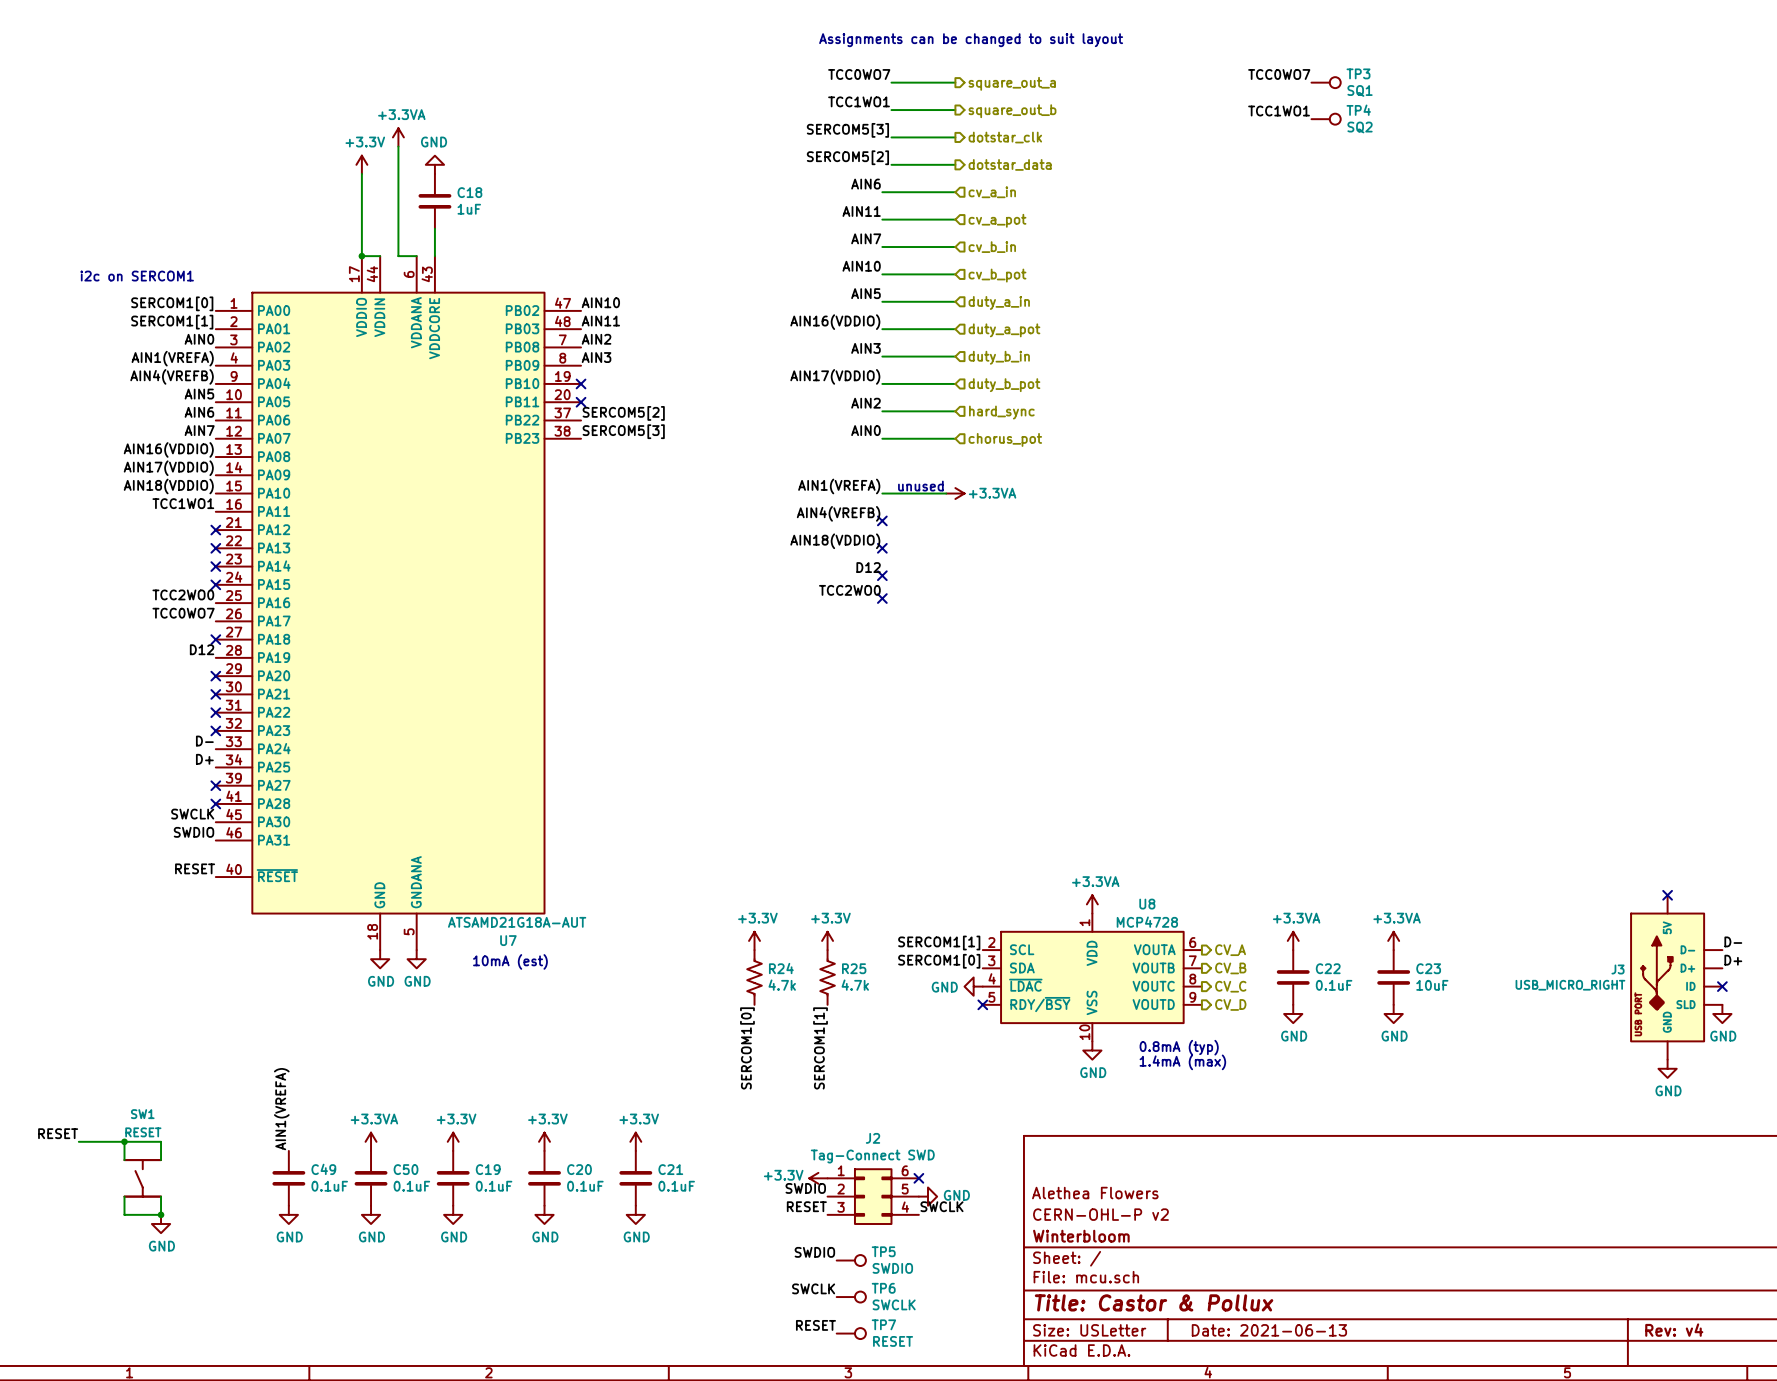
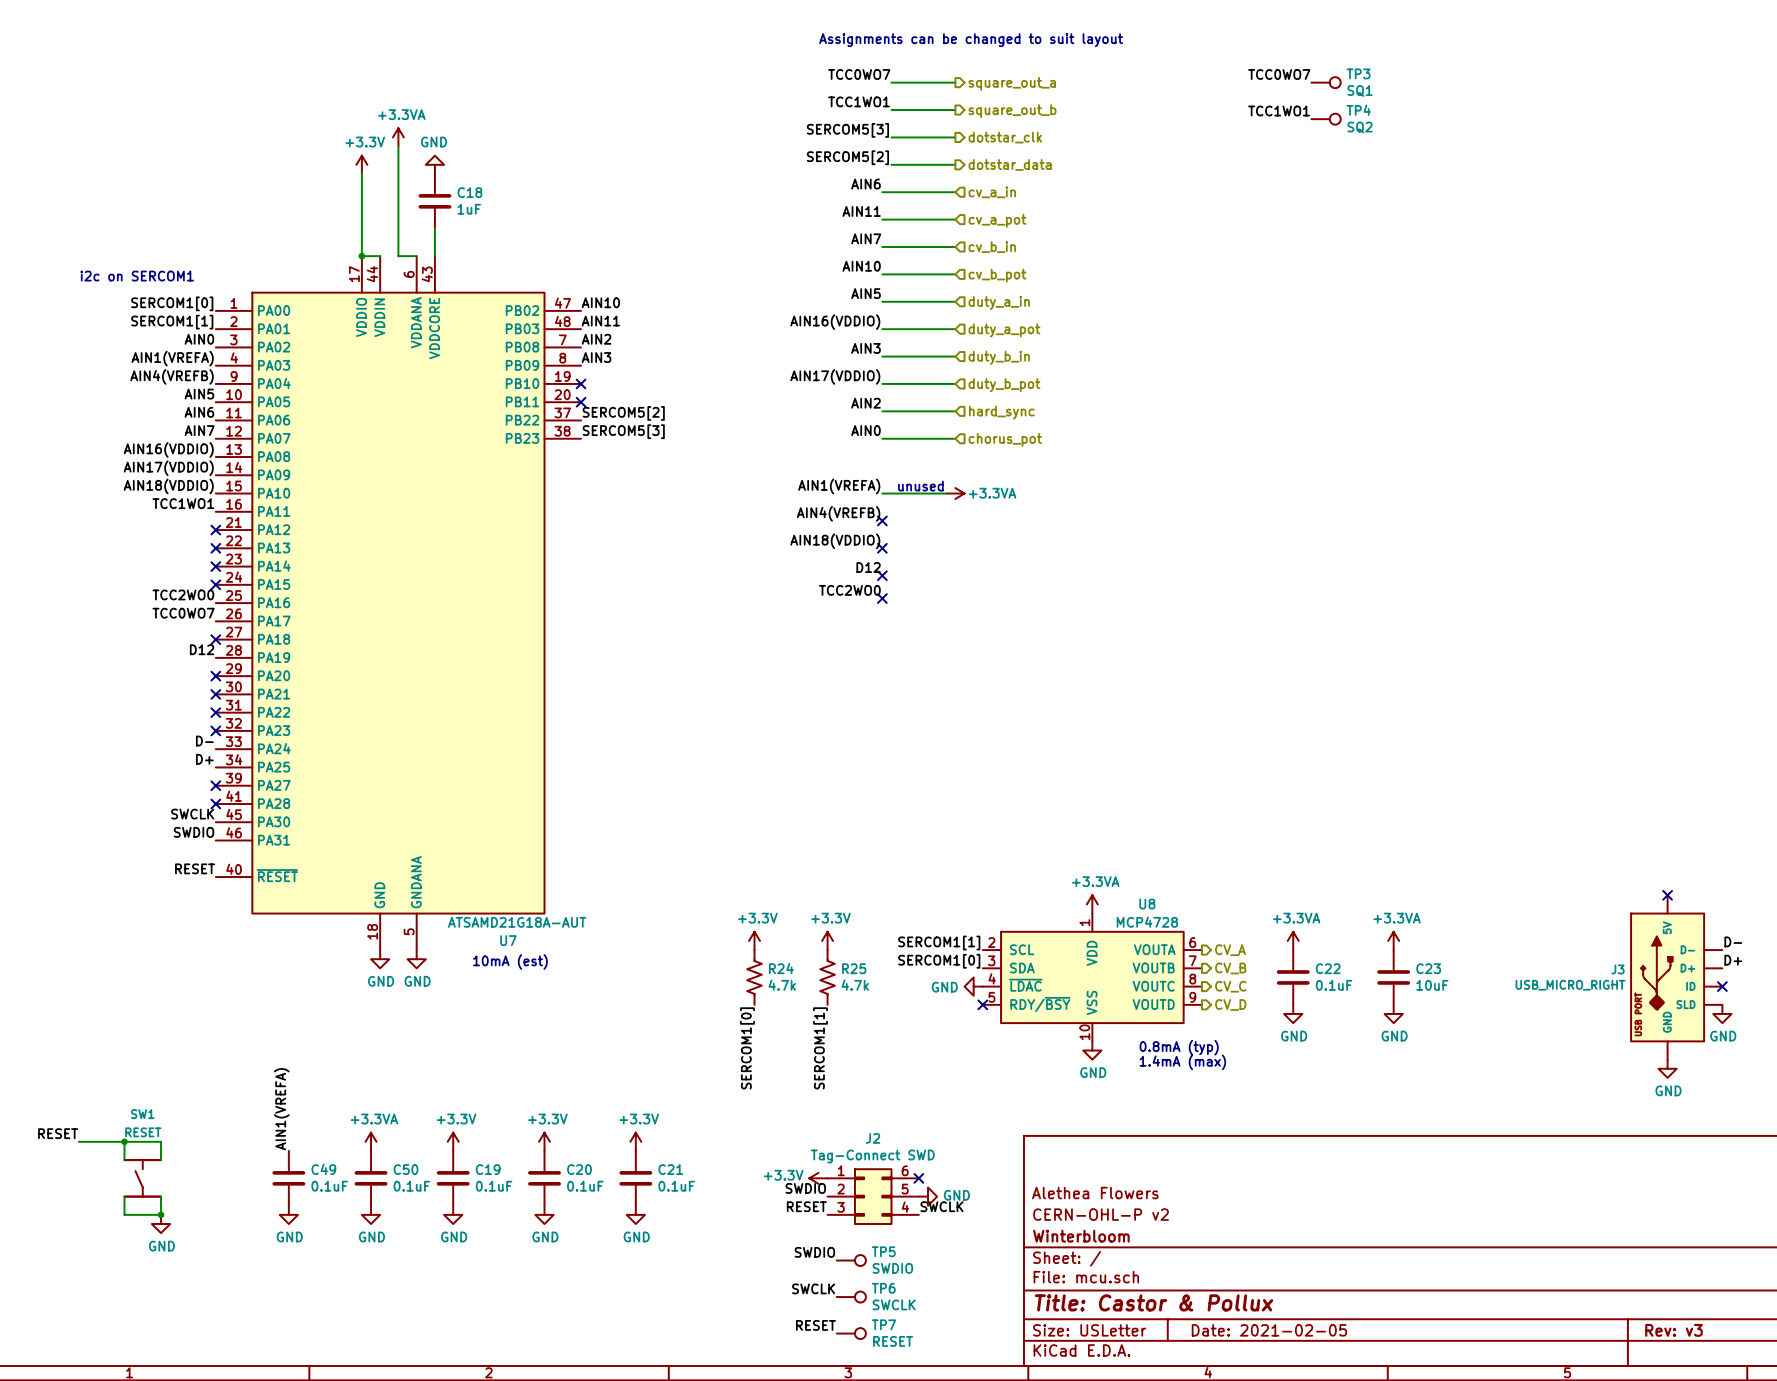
title block: Date: 2021-06-13 (1269, 1330) -> Date: 2021-02-05 (1269, 1330)
title block: Rev: v4 (1674, 1330) -> Rev: v3 (1674, 1330)

